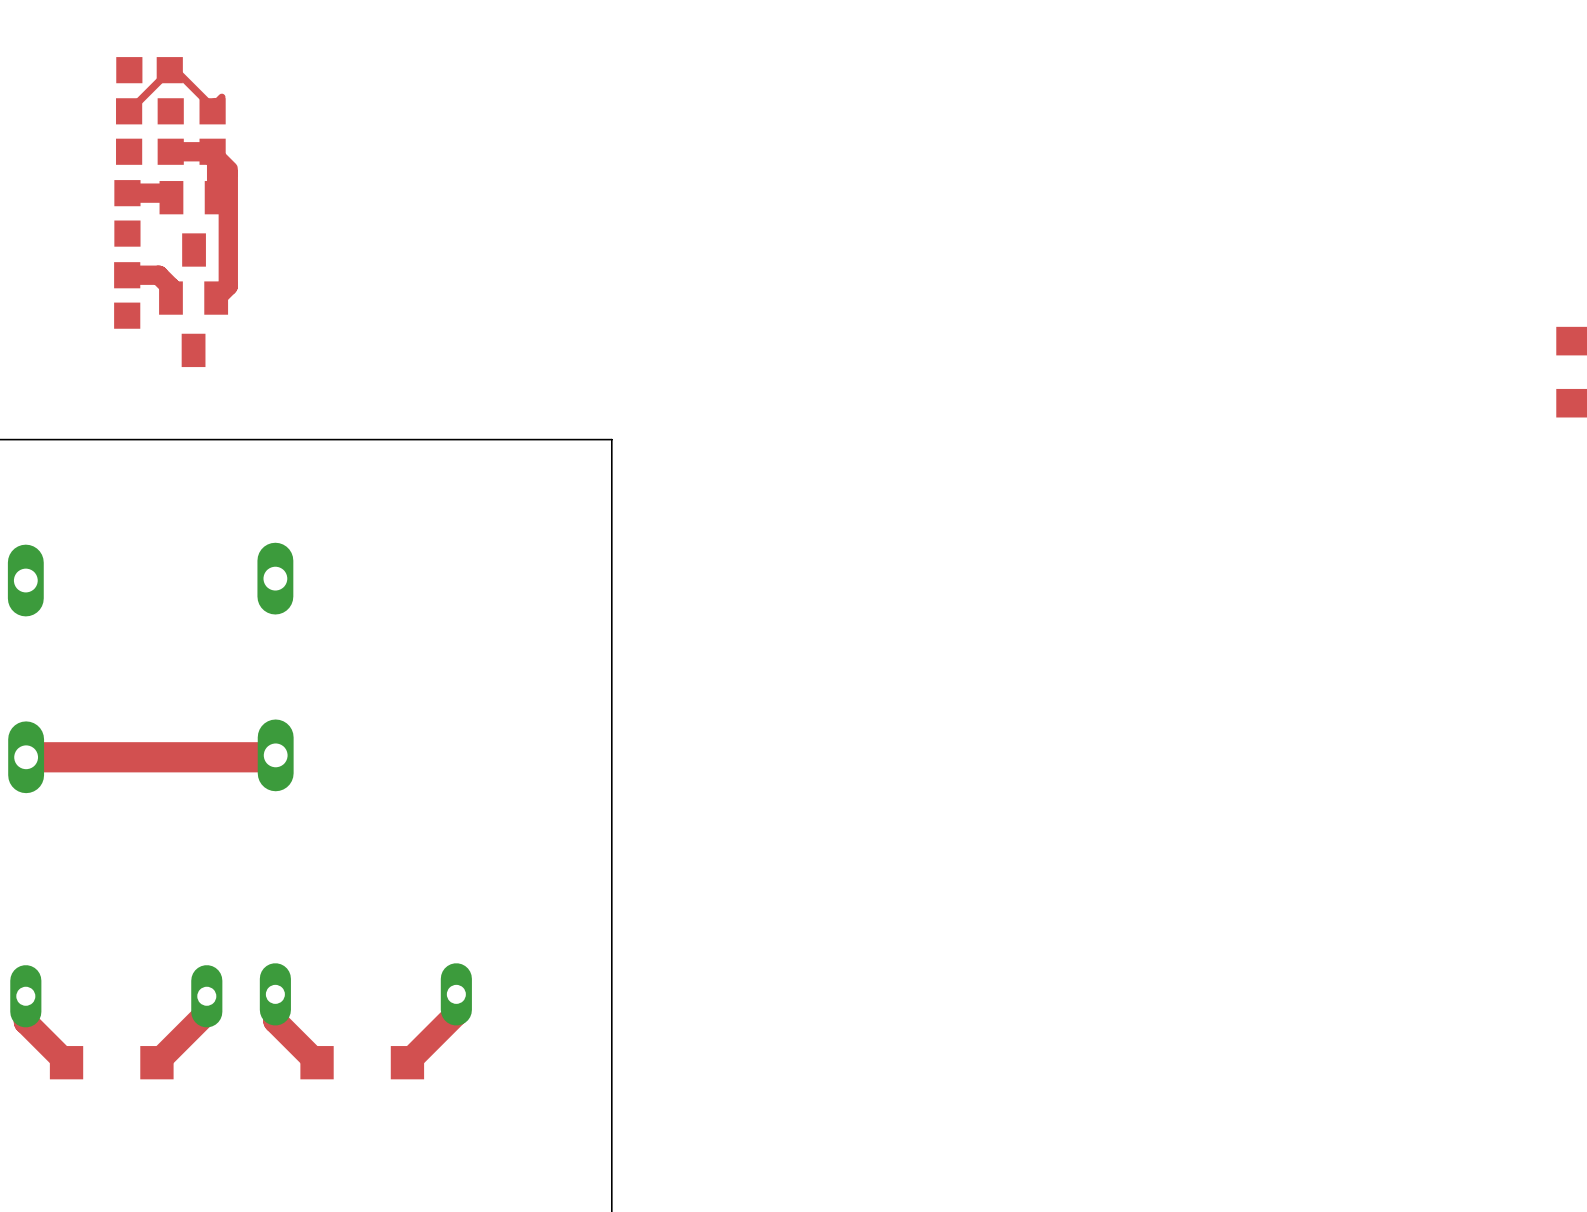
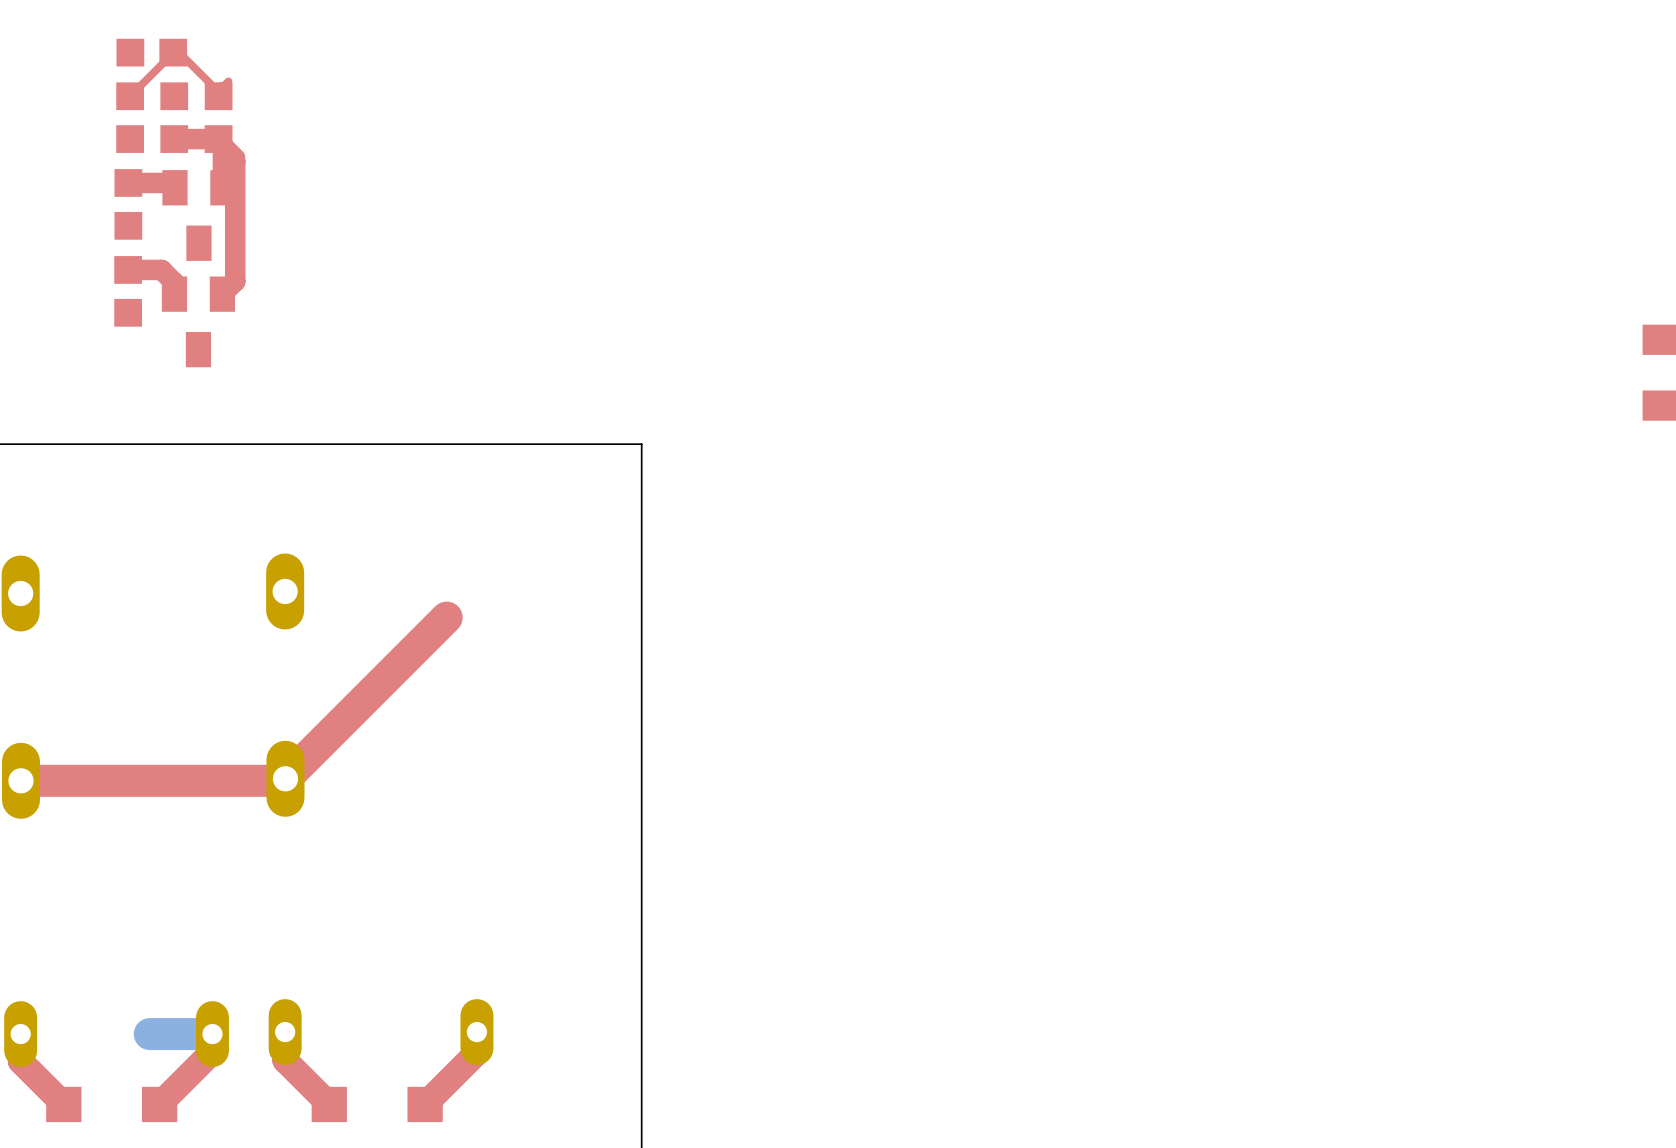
top track: none -> (446, 617) (285, 778)
bottom track: none -> (212, 1034) (149, 1034)

